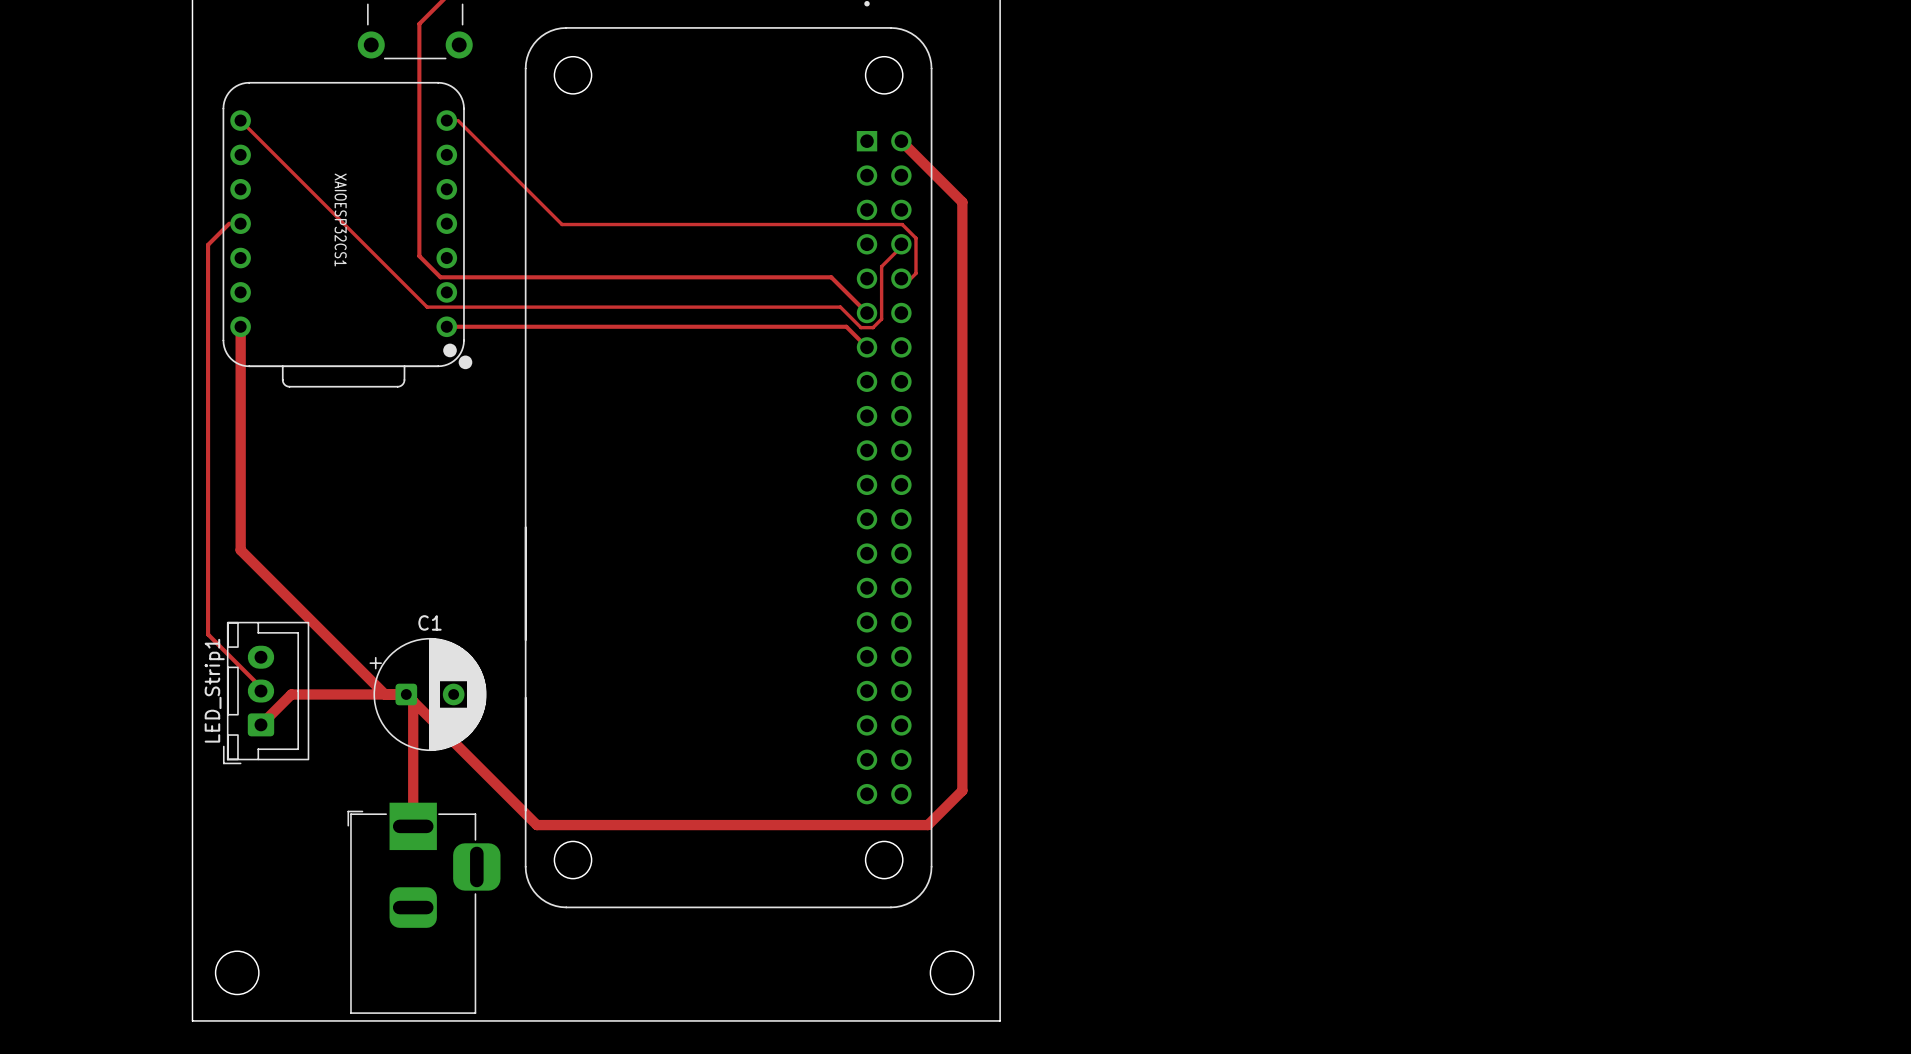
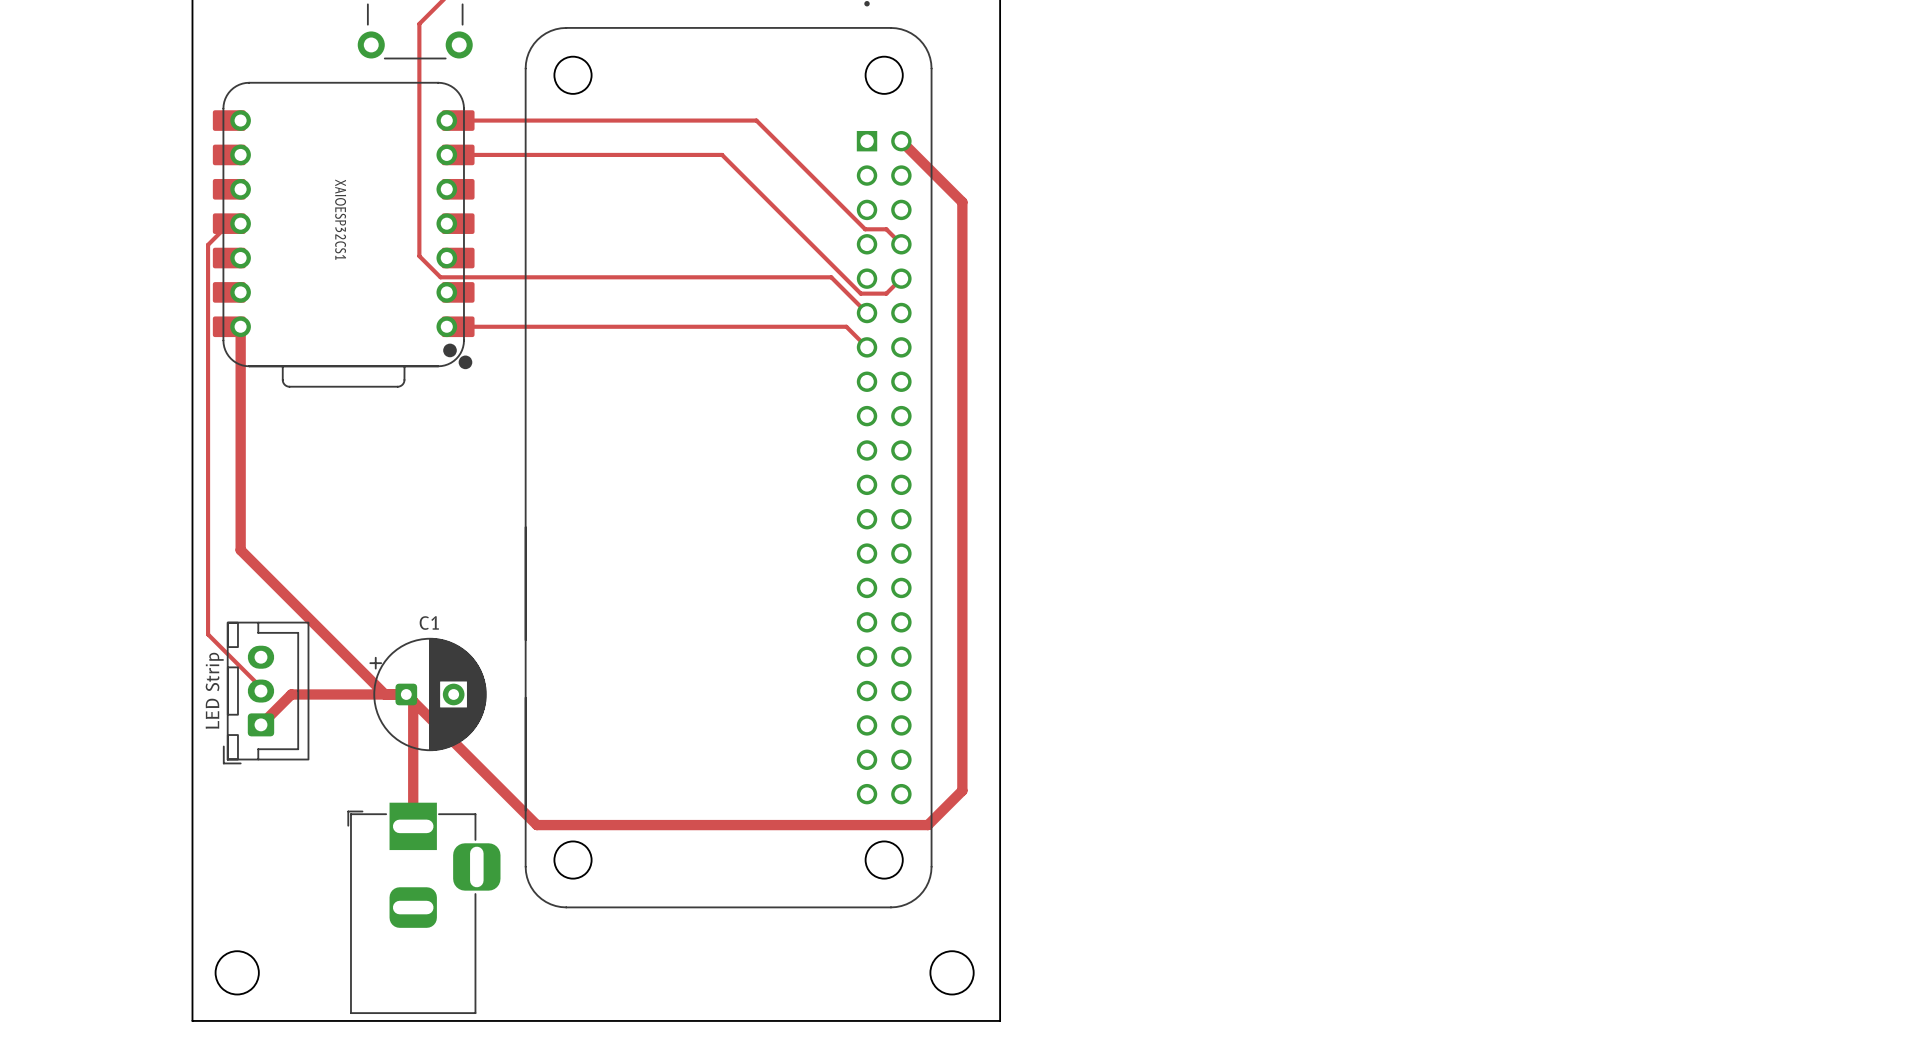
XAIOESP32CS1 footprint: [222, 81, 473, 388] -> [212, 81, 475, 388]
track: (240, 120) (427, 307) (840, 307) (860, 327) (873, 327) (881, 319) (881, 266) (903, 244) (901, 244) -> (446, 120) (756, 120) (865, 229) (886, 229) (901, 244)
track: (458, 120) (562, 224) (902, 224) (915, 238) (915, 273) (907, 282) (901, 278) -> (446, 154) (722, 154) (860, 293) (886, 293) (901, 278)
LED_Strip1 name: LED_Strip1 (214, 690) -> LED Strip (214, 690)

